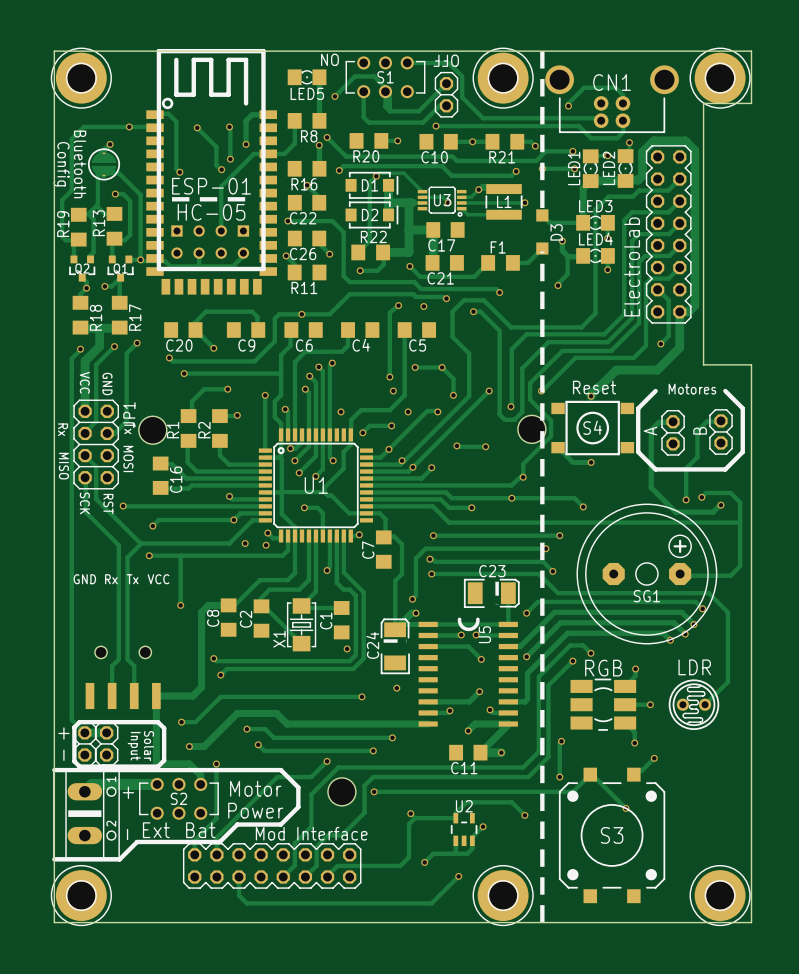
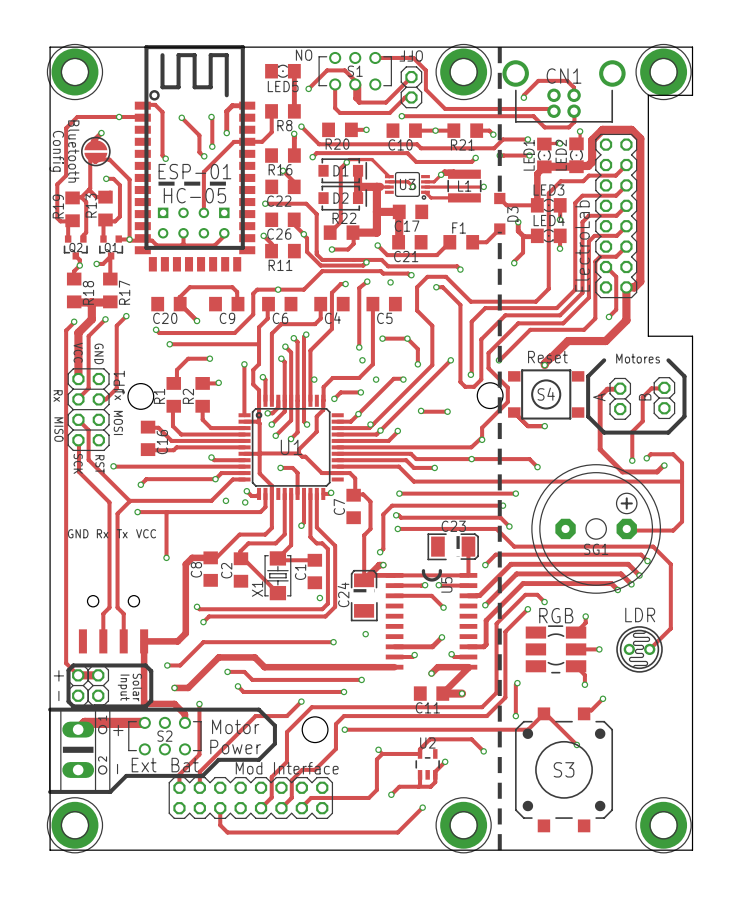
track: none -> (303, 234) (307, 238) (307, 251) (320, 265) (363, 265) (366, 262)
via: none -> (366, 262)
track: none -> (345, 284) (340, 284) (331, 292) (331, 329) (310, 350) (310, 400)
via: none -> (345, 284)

